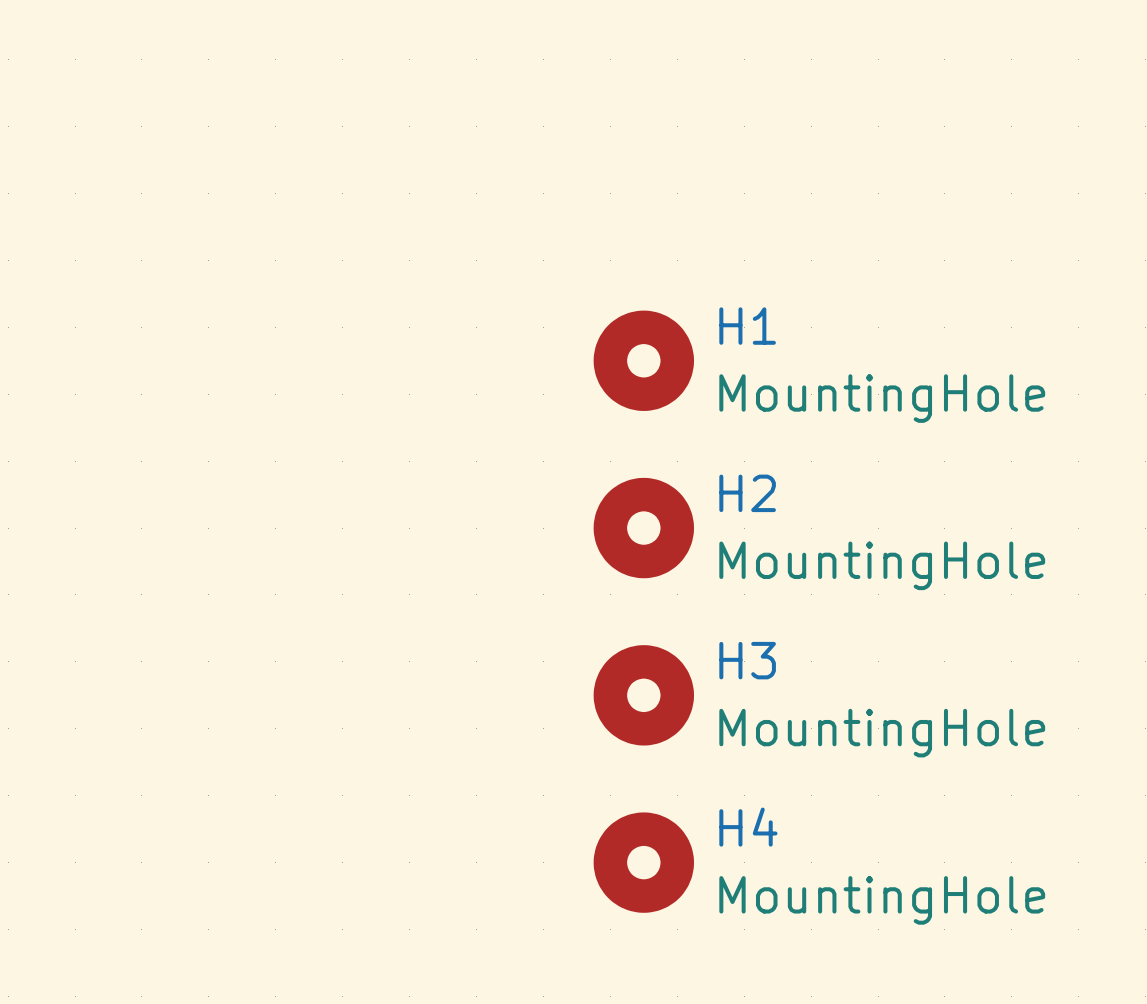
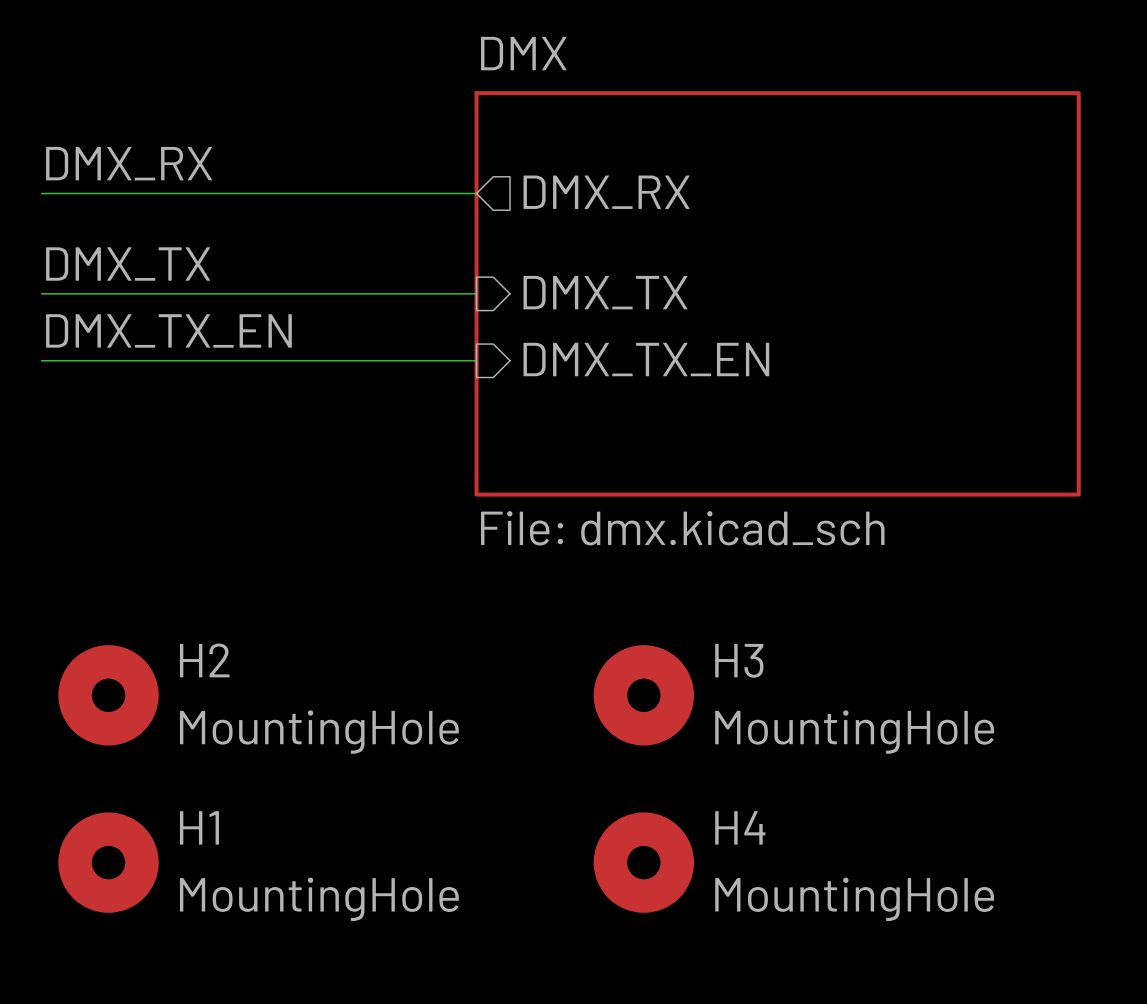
label: none -> DMX_RX (129, 163)
wire: none -> (41, 193) (476, 193)
sheet pin: none -> DMX_RX (606, 192)
label: none -> DMX_TX (128, 264)
wire: none -> (41, 293) (476, 293)
sheet DMX: none -> File: dmx.kicad_sch (777, 293)
sheet pin: none -> DMX_TX (605, 292)
label: none -> DMX_TX_EN (168, 330)
wire: none -> (41, 360) (476, 360)
H1 position: (643, 360) -> (108, 862)
sheet pin: none -> DMX_TX_EN (646, 359)
H2 position: (643, 528) -> (108, 695)

